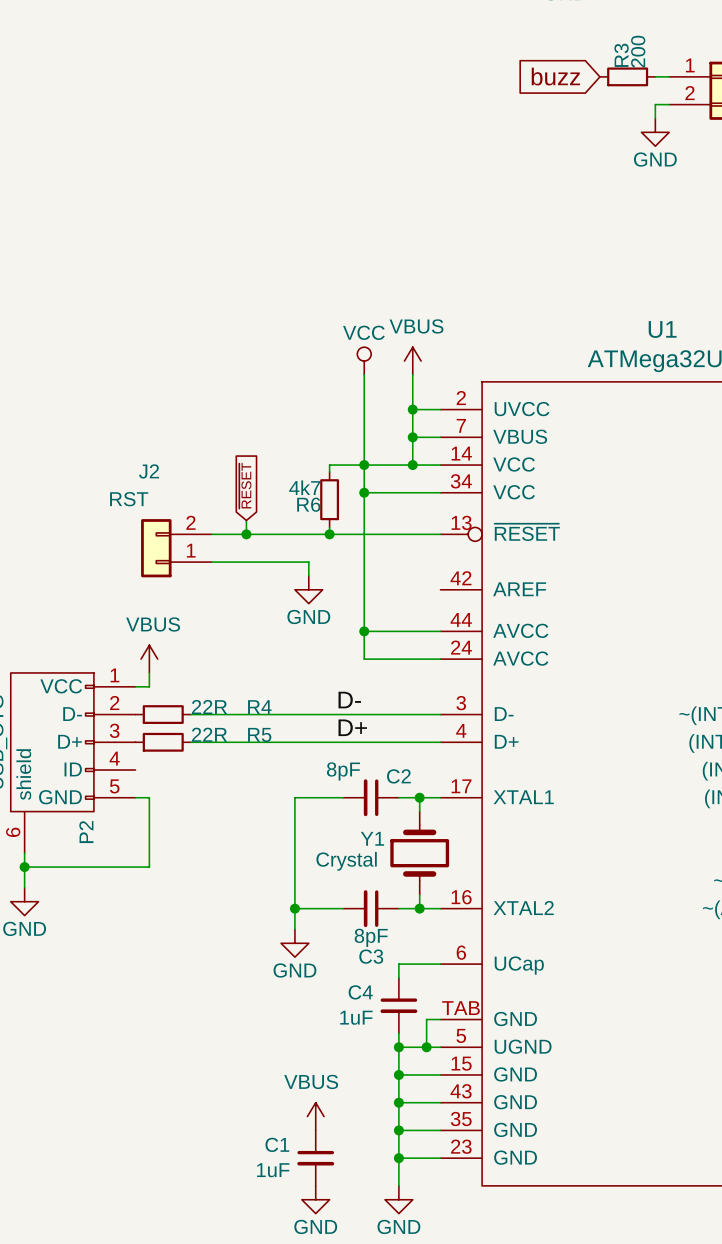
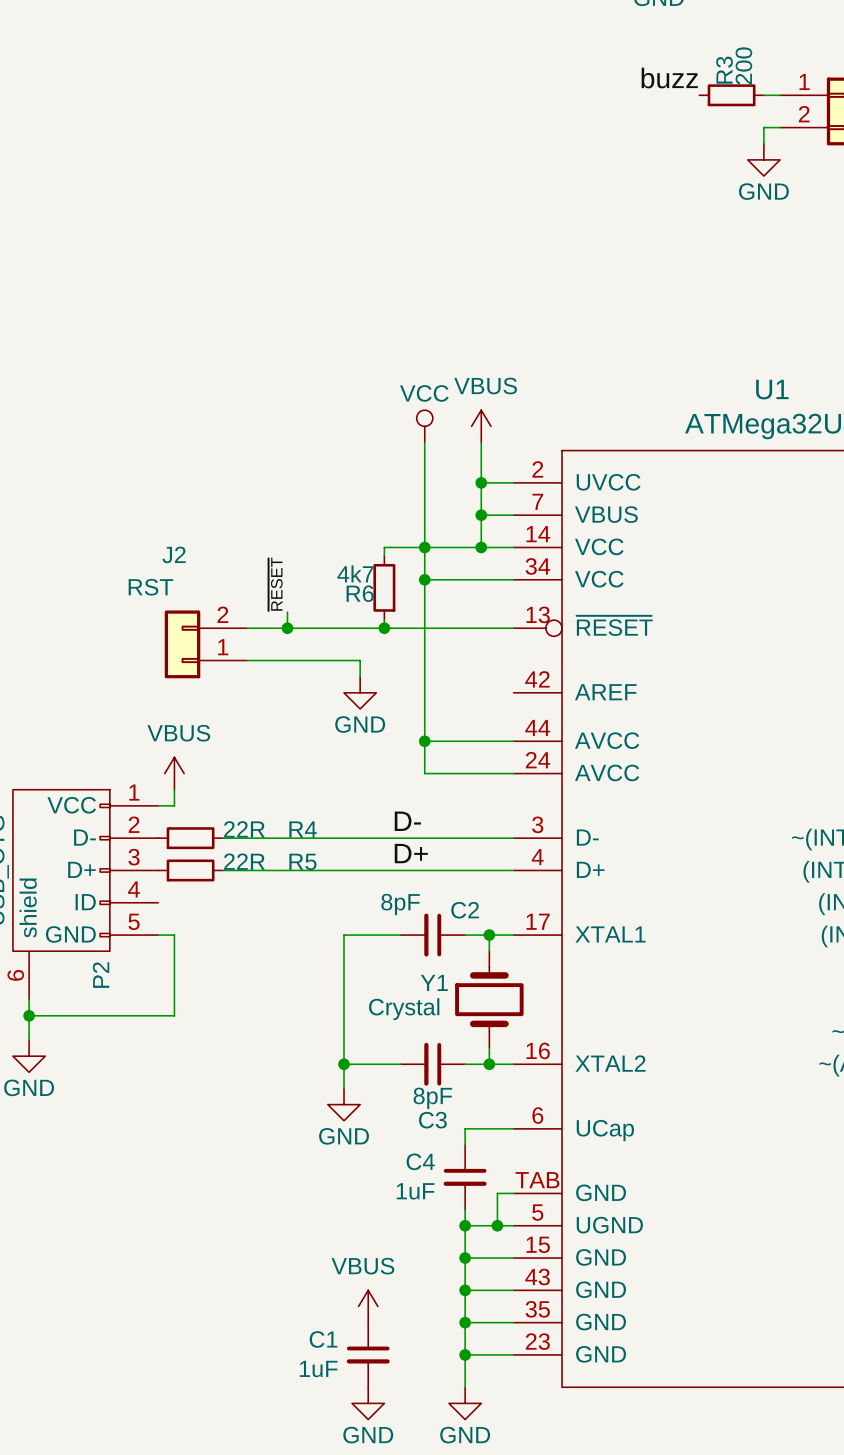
label: none -> buzz (669, 78)
global label: buzz (555, 76) -> none
global label: ~{RESET} (245, 485) -> none
label: none -> ~{RESET} (275, 584)

